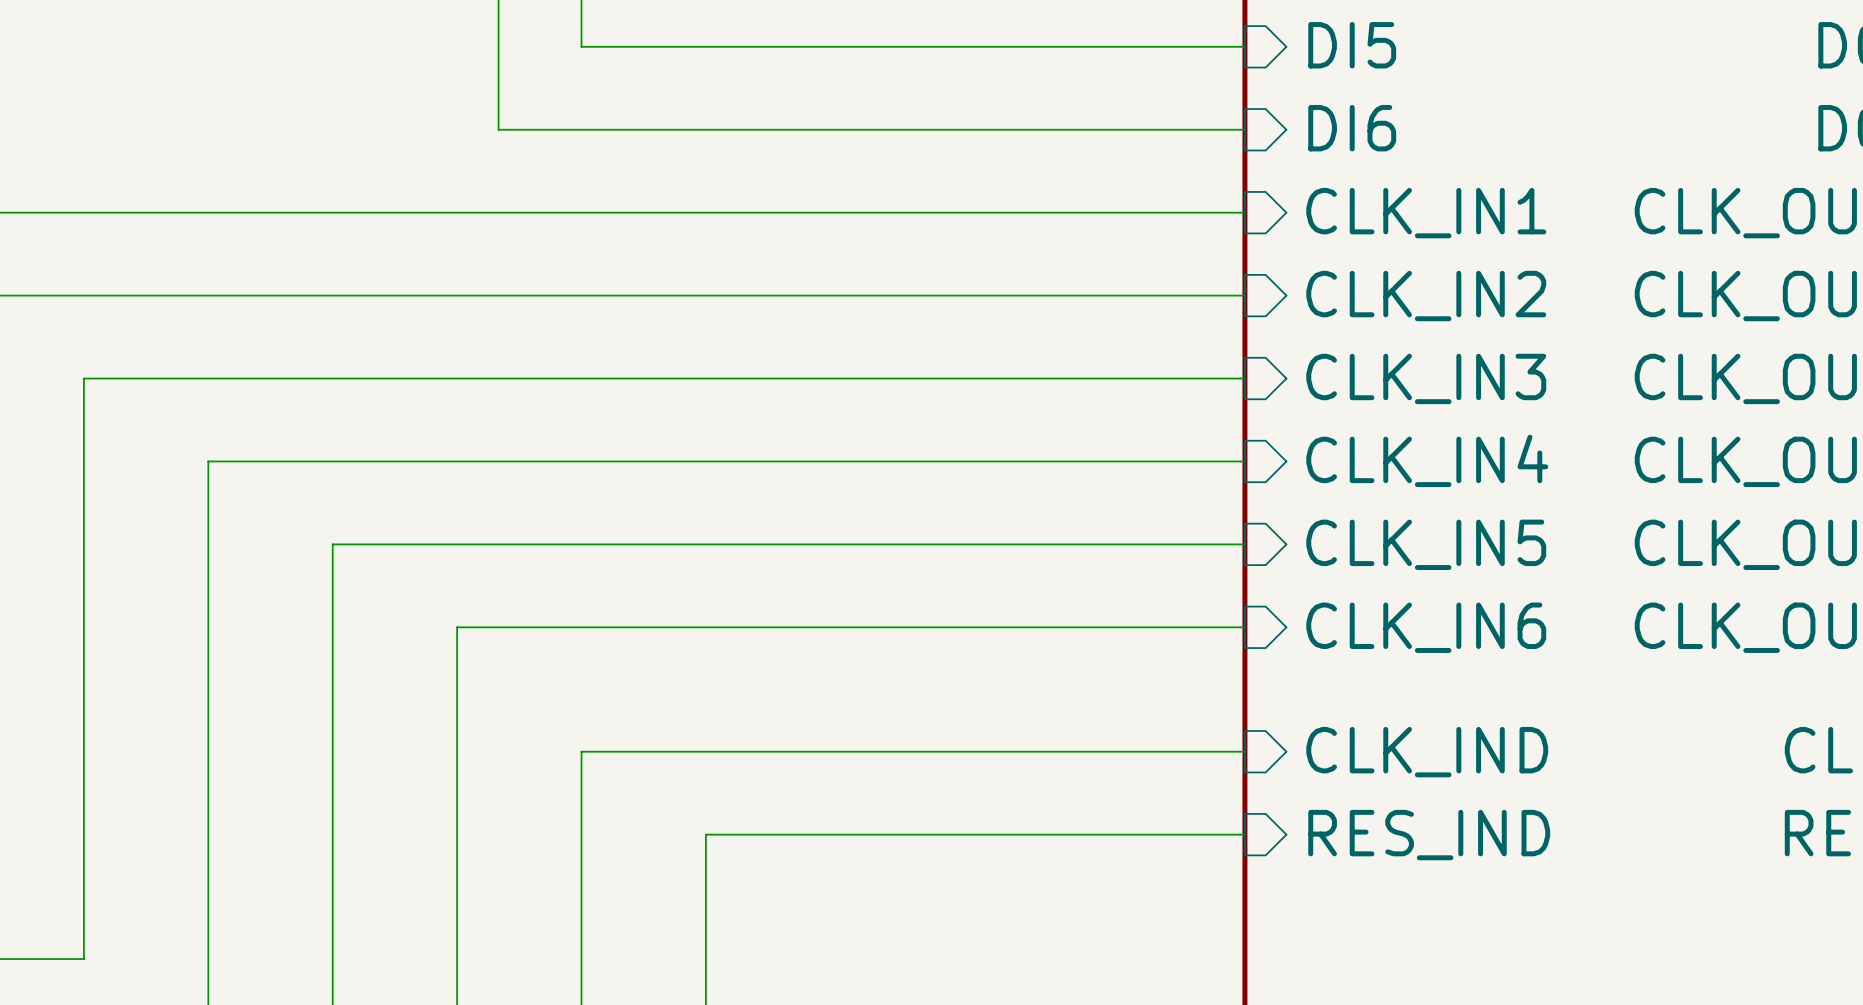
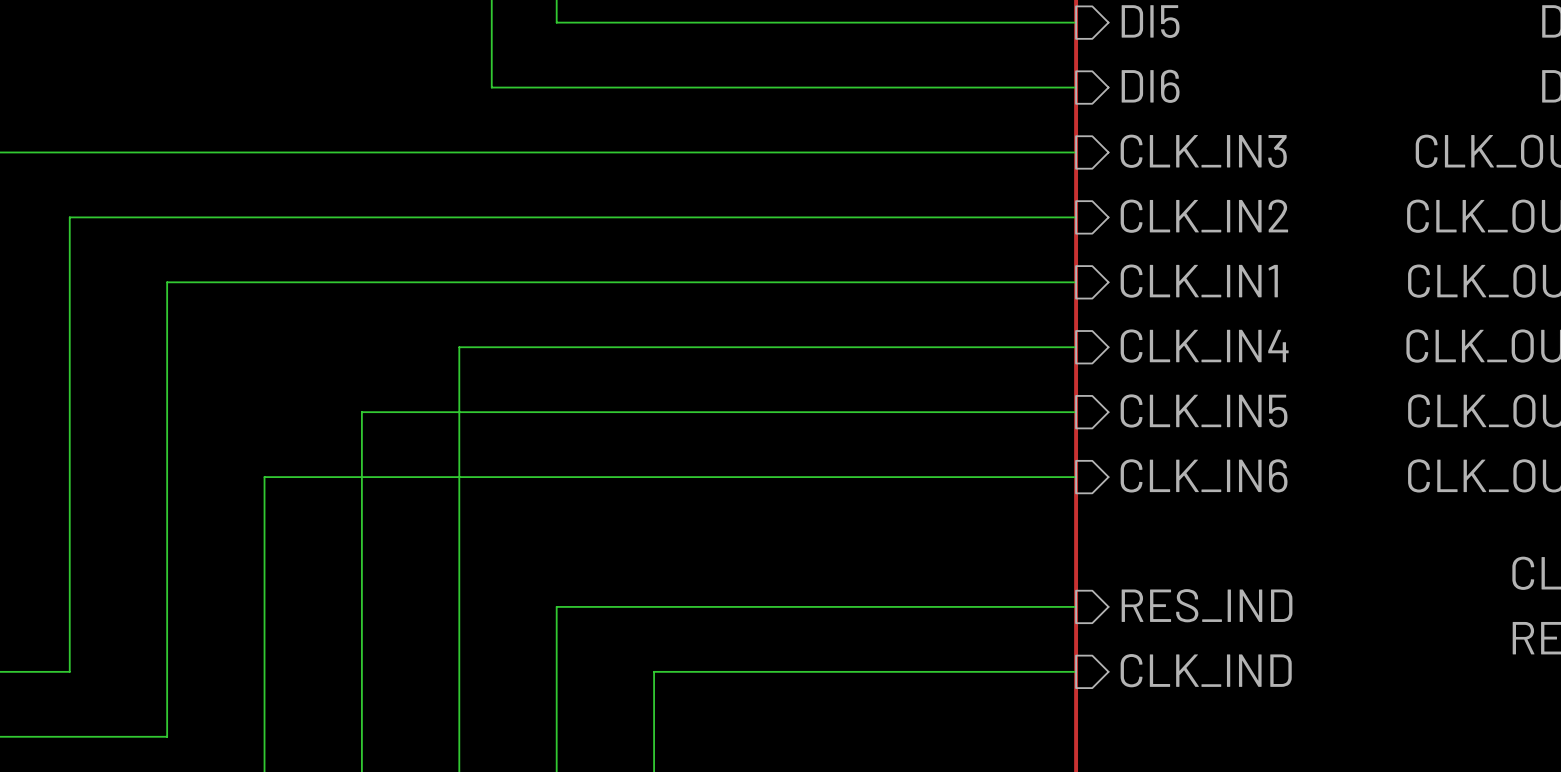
sheet pin: CLK_IN1 (1426, 213) -> CLK_IN3 (1203, 151)
sheet pin: CLK_IN3 (1426, 378) -> CLK_IN1 (1199, 281)
wire: (457, 461) (208, 461) (208, 627) -> (459, 347) (459, 477) (264, 477)
wire: (1244, 751) (581, 751) (581, 793) -> (1076, 606) (556, 606)
sheet pin position: CLK_IND (1427, 752) -> CLK_IND (1206, 670)
wire: (1244, 834) (705, 834) (705, 876) -> (1076, 671) (654, 671)
sheet pin position: RES_IND (1429, 835) -> RES_IND (1207, 605)

